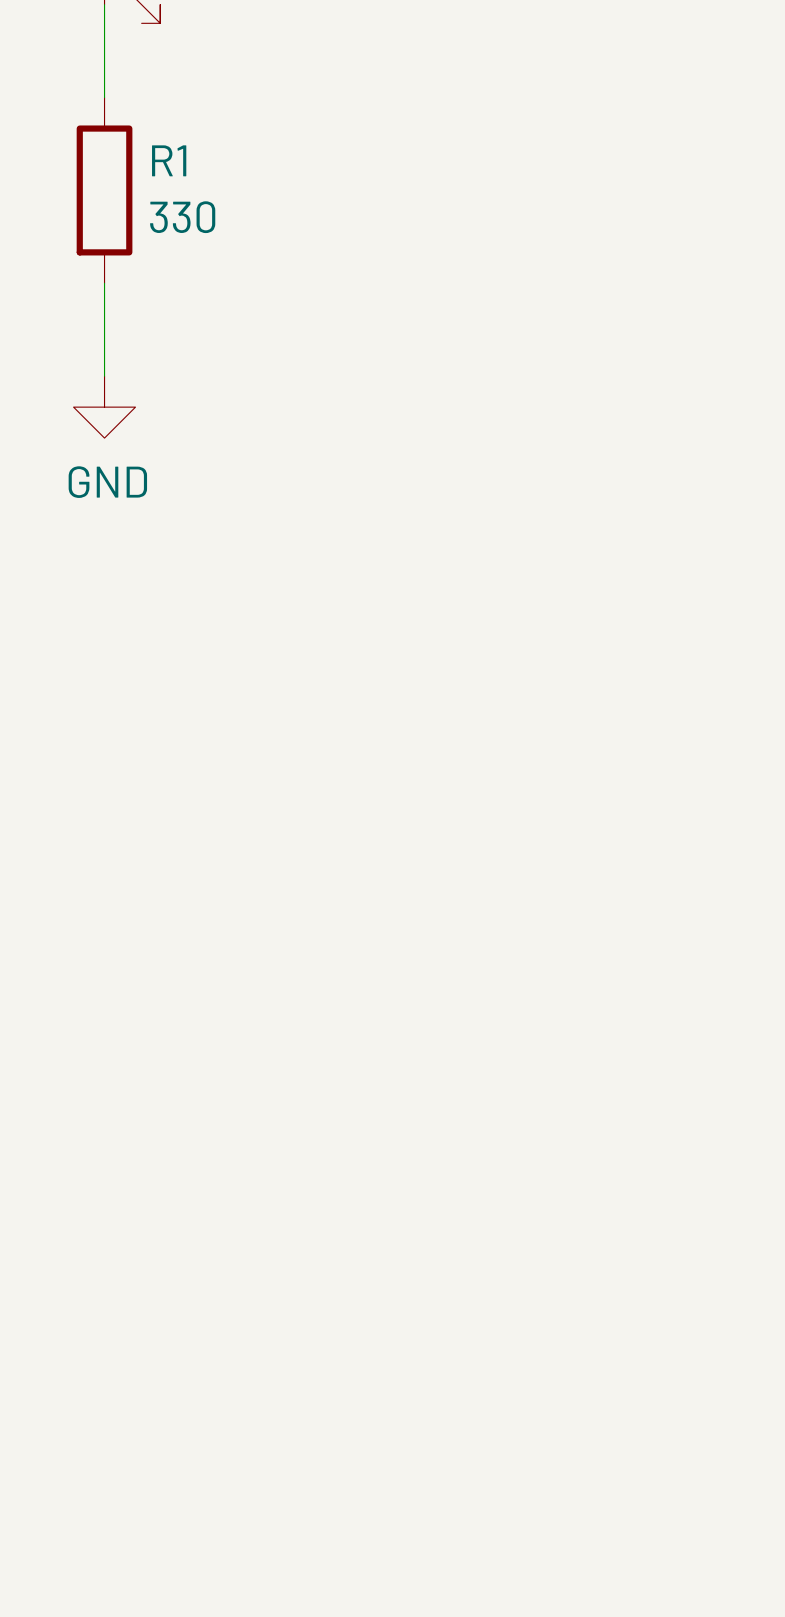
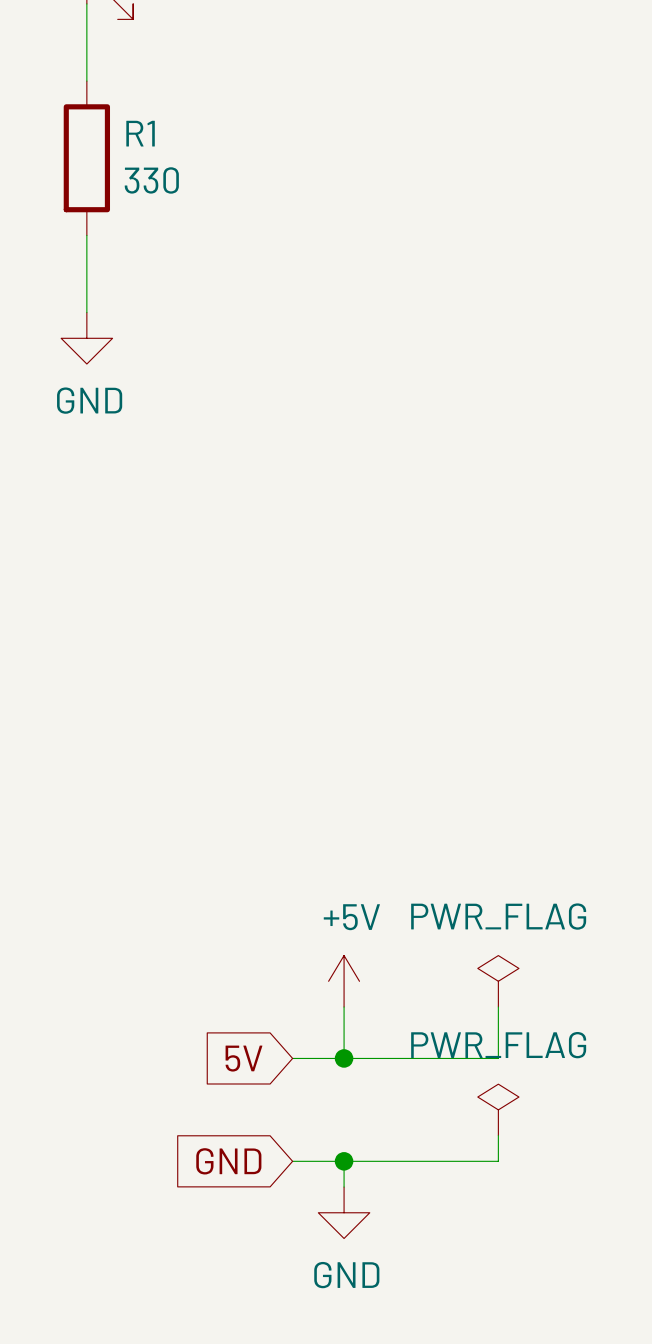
power symbol: none -> +5V (344, 981)
power symbol: none -> PWR_FLAG (498, 981)
wire: none -> (344, 1007) (344, 1058)
wire: none -> (498, 1007) (498, 1058) (292, 1058)
global label: none -> 5V (244, 1058)
junction: none -> (344, 1058)
power symbol: none -> PWR_FLAG (498, 1109)
wire: none -> (498, 1135) (498, 1161) (292, 1161)
global label: none -> GND (228, 1161)
wire: none -> (344, 1161) (344, 1187)
junction: none -> (344, 1161)
power symbol: none -> GND (344, 1212)

